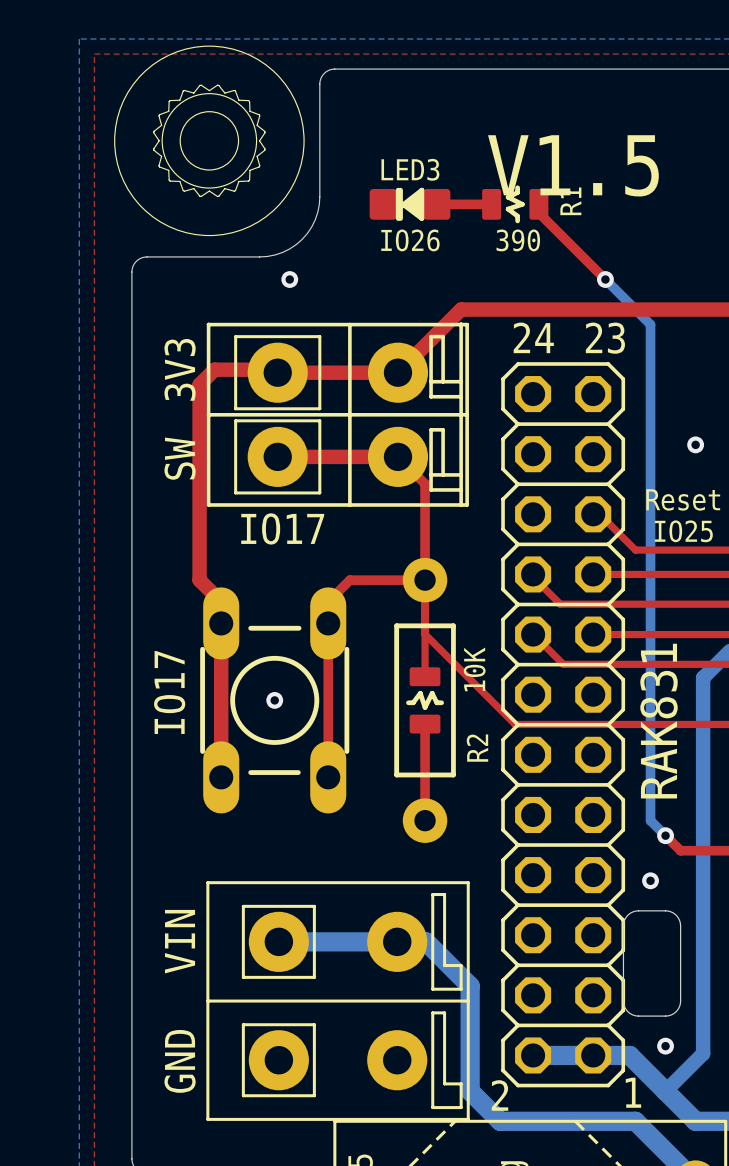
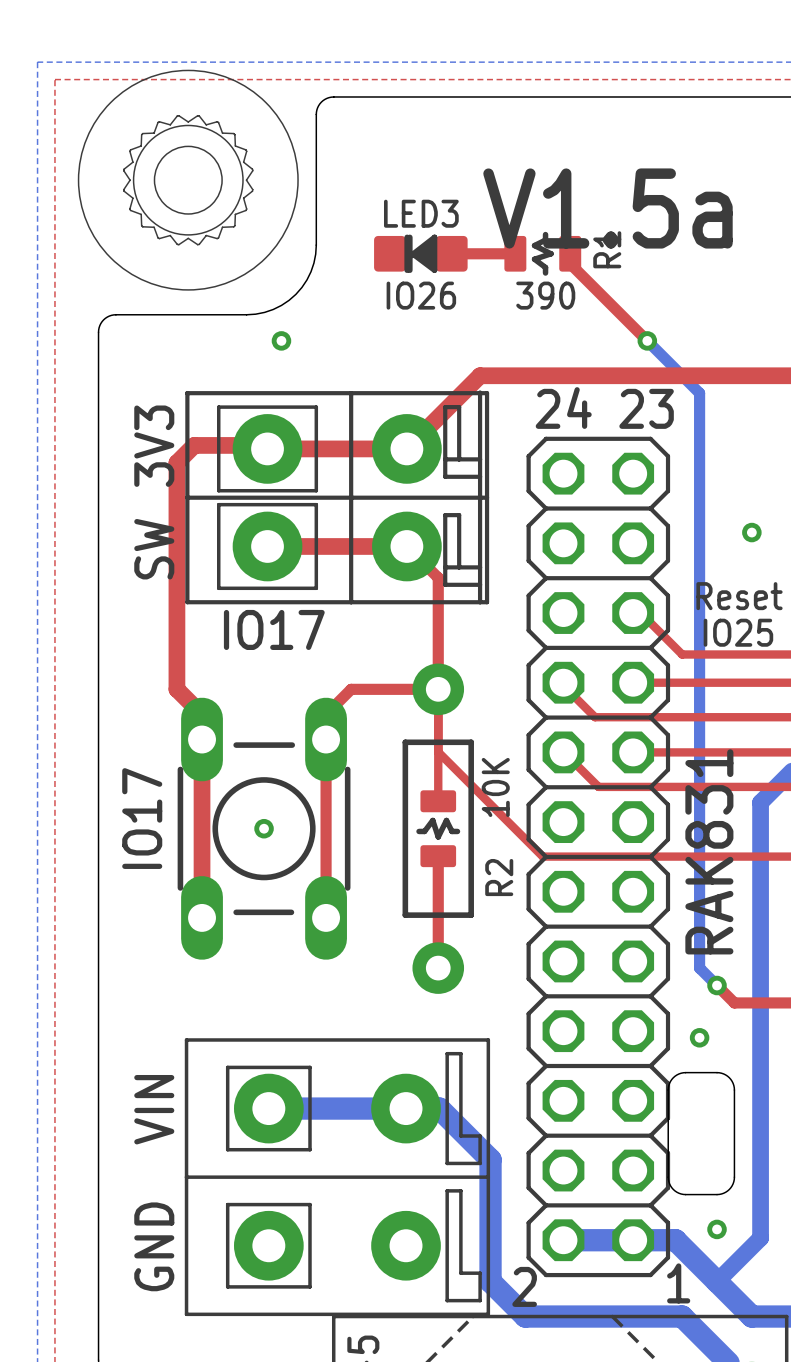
text: V1.5 (573, 165) -> V1.5a (608, 208)

